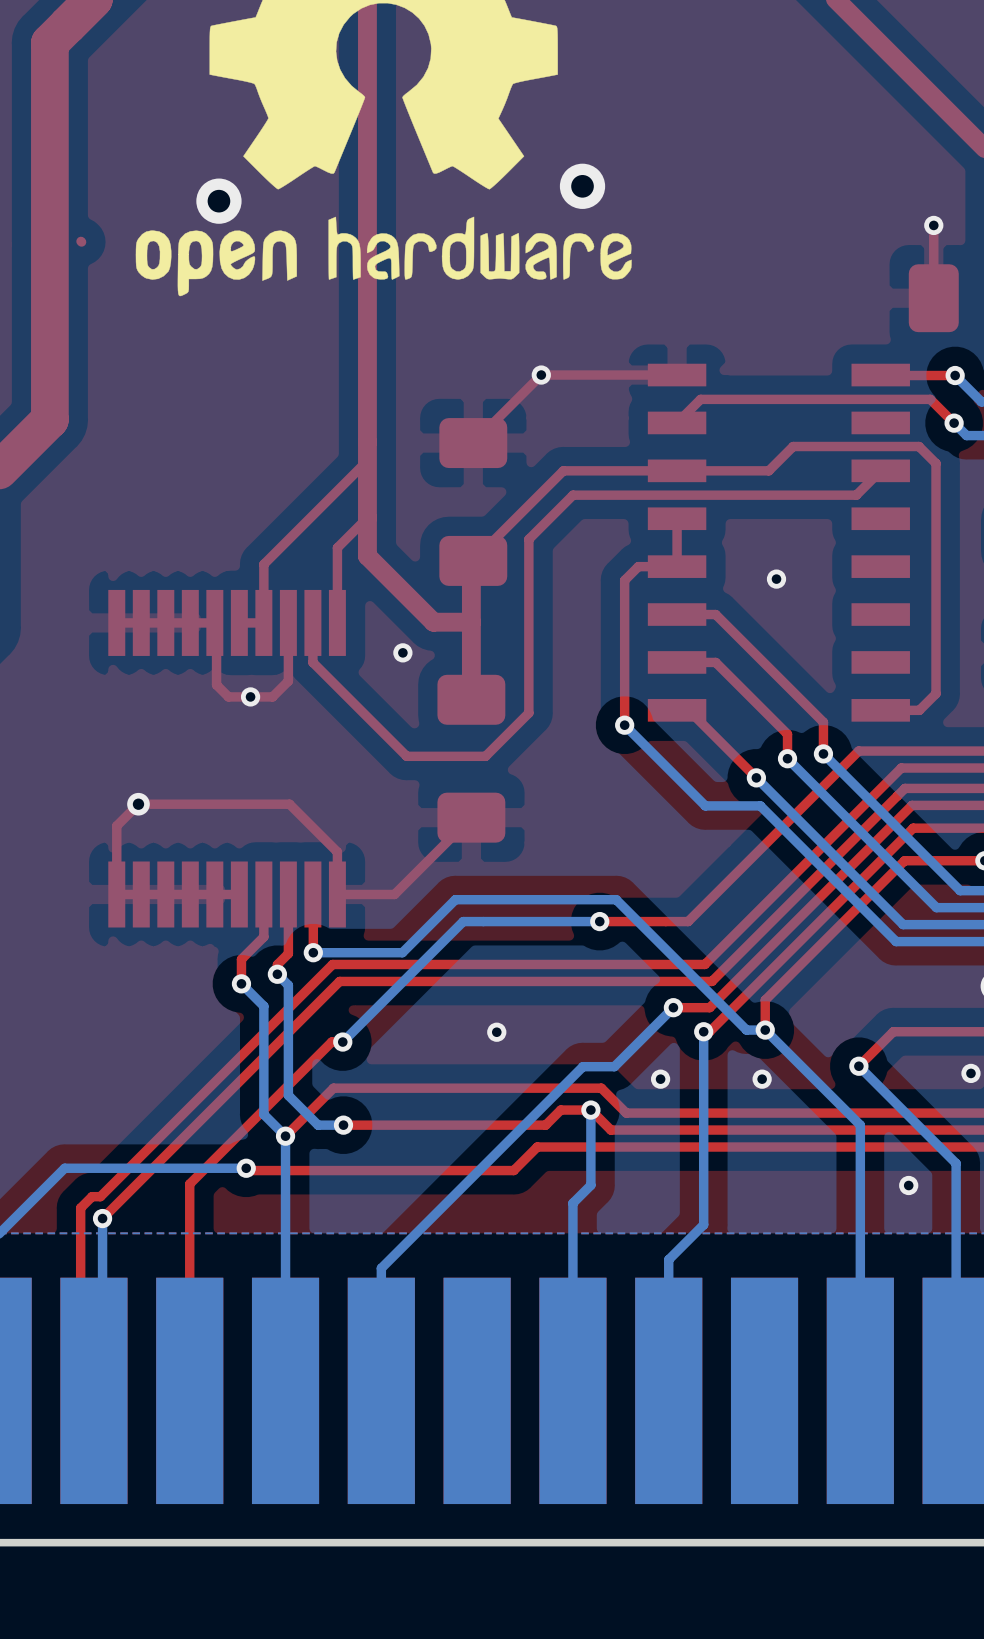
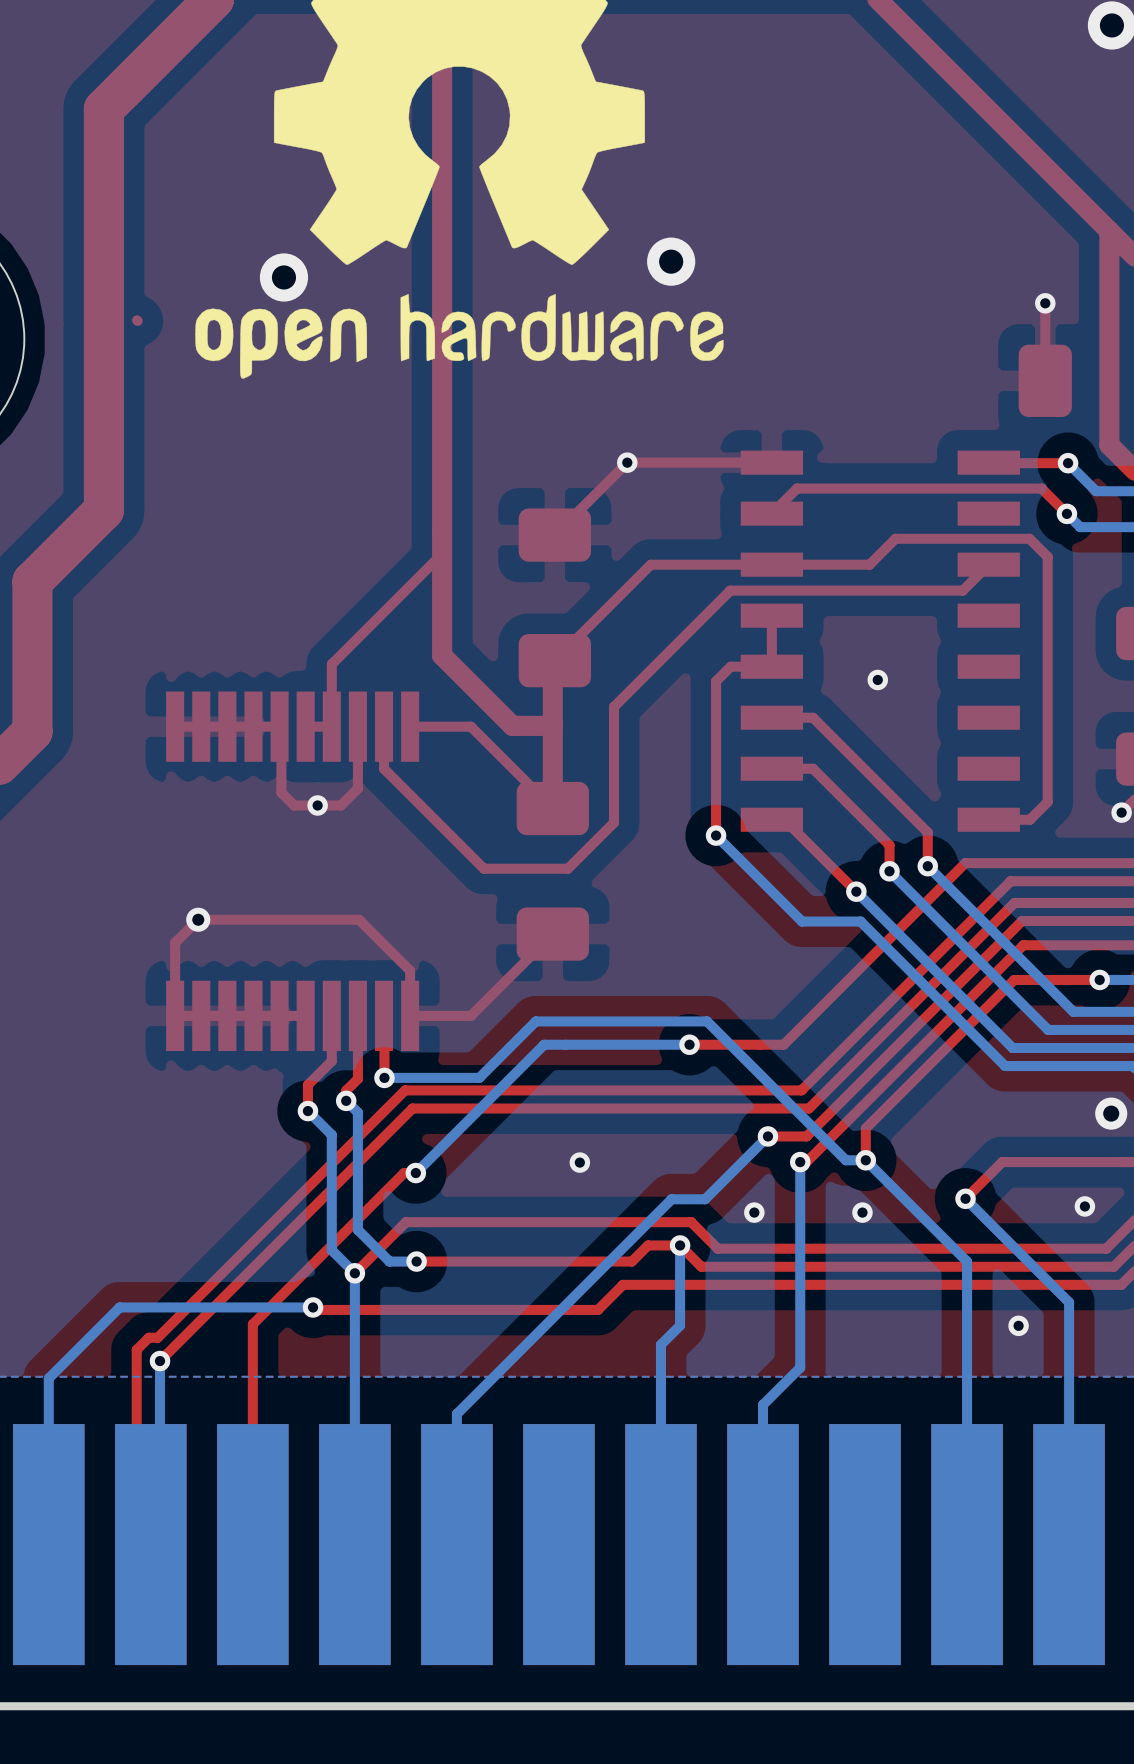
top track: (638, 495) (573, 495) (528, 539) (528, 604) -> (730, 590) (614, 706)
top track: (367, 517) (337, 547) (337, 622) -> (552, 808) (470, 726) (410, 726)
via: (402, 652) -> none

